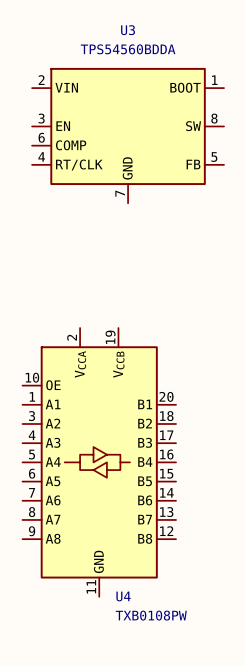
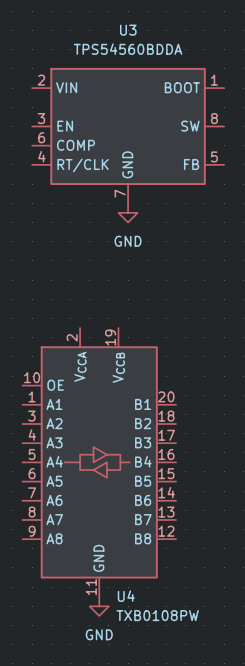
power symbol: none -> GND (128, 212)
power symbol: none -> GND (99, 606)

